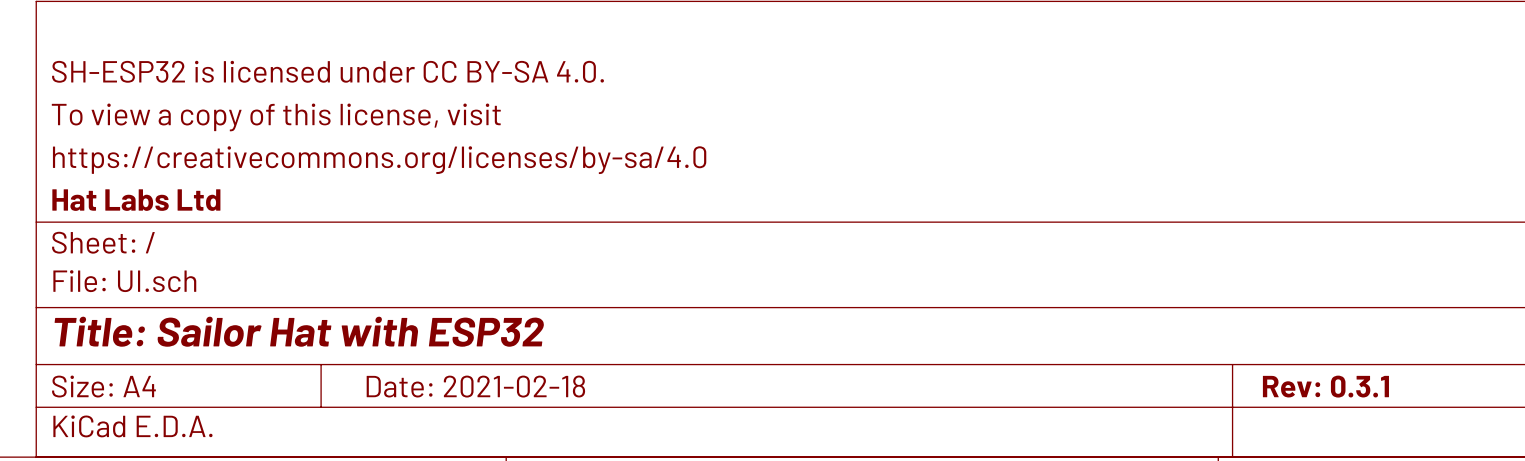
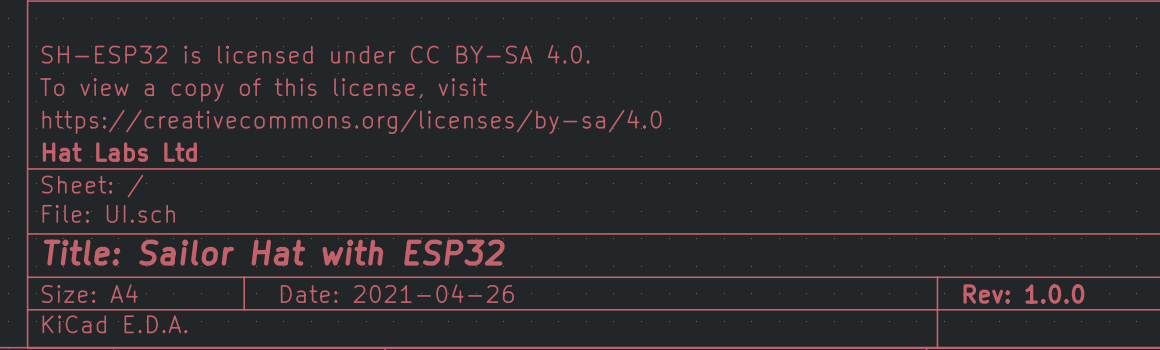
title block: Date: 2021-02-18 (475, 386) -> Date: 2021-04-26 (397, 293)
title block: Rev: 0.3.1 (1325, 386) -> Rev: 1.0.0 (1023, 294)

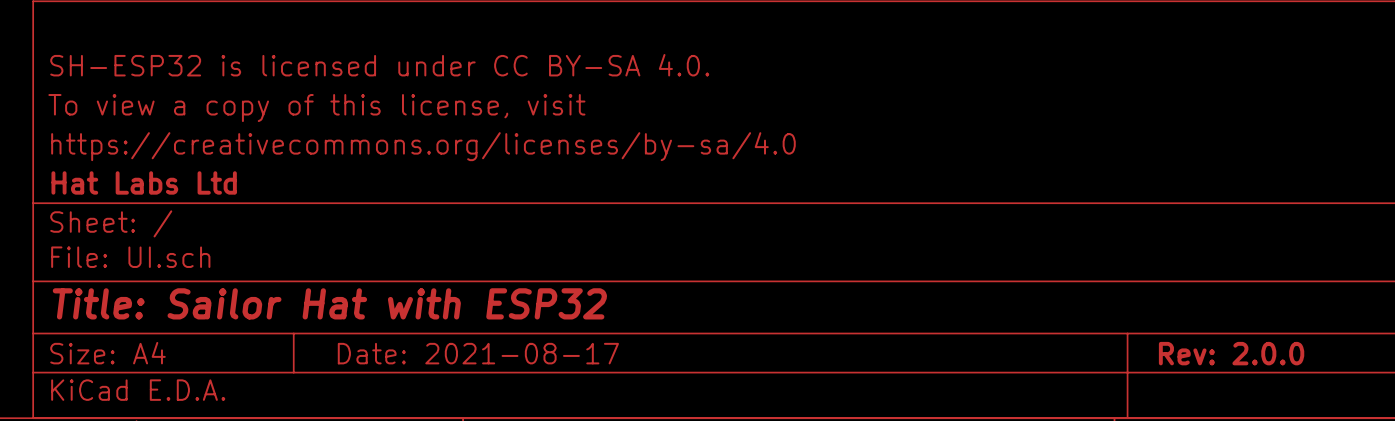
title block: Date: 2021-04-26 (397, 293) -> Date: 2021-08-17 (478, 353)
title block: Rev: 1.0.0 (1023, 294) -> Rev: 2.0.0 (1231, 353)

